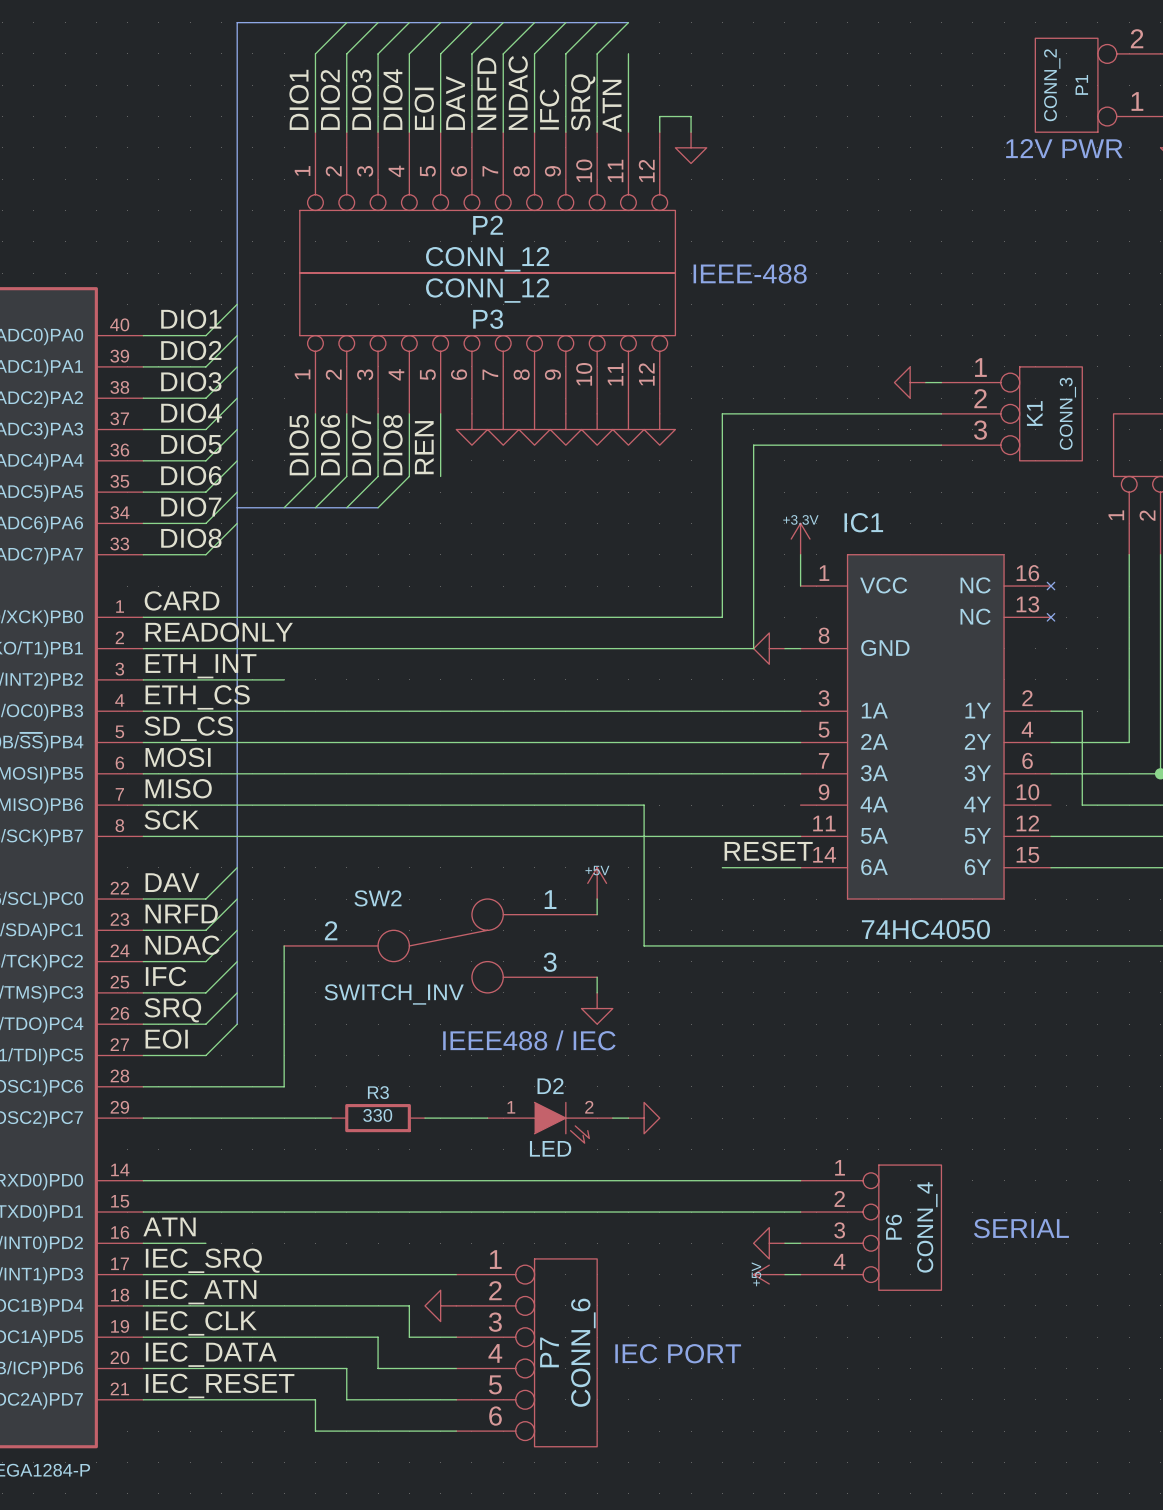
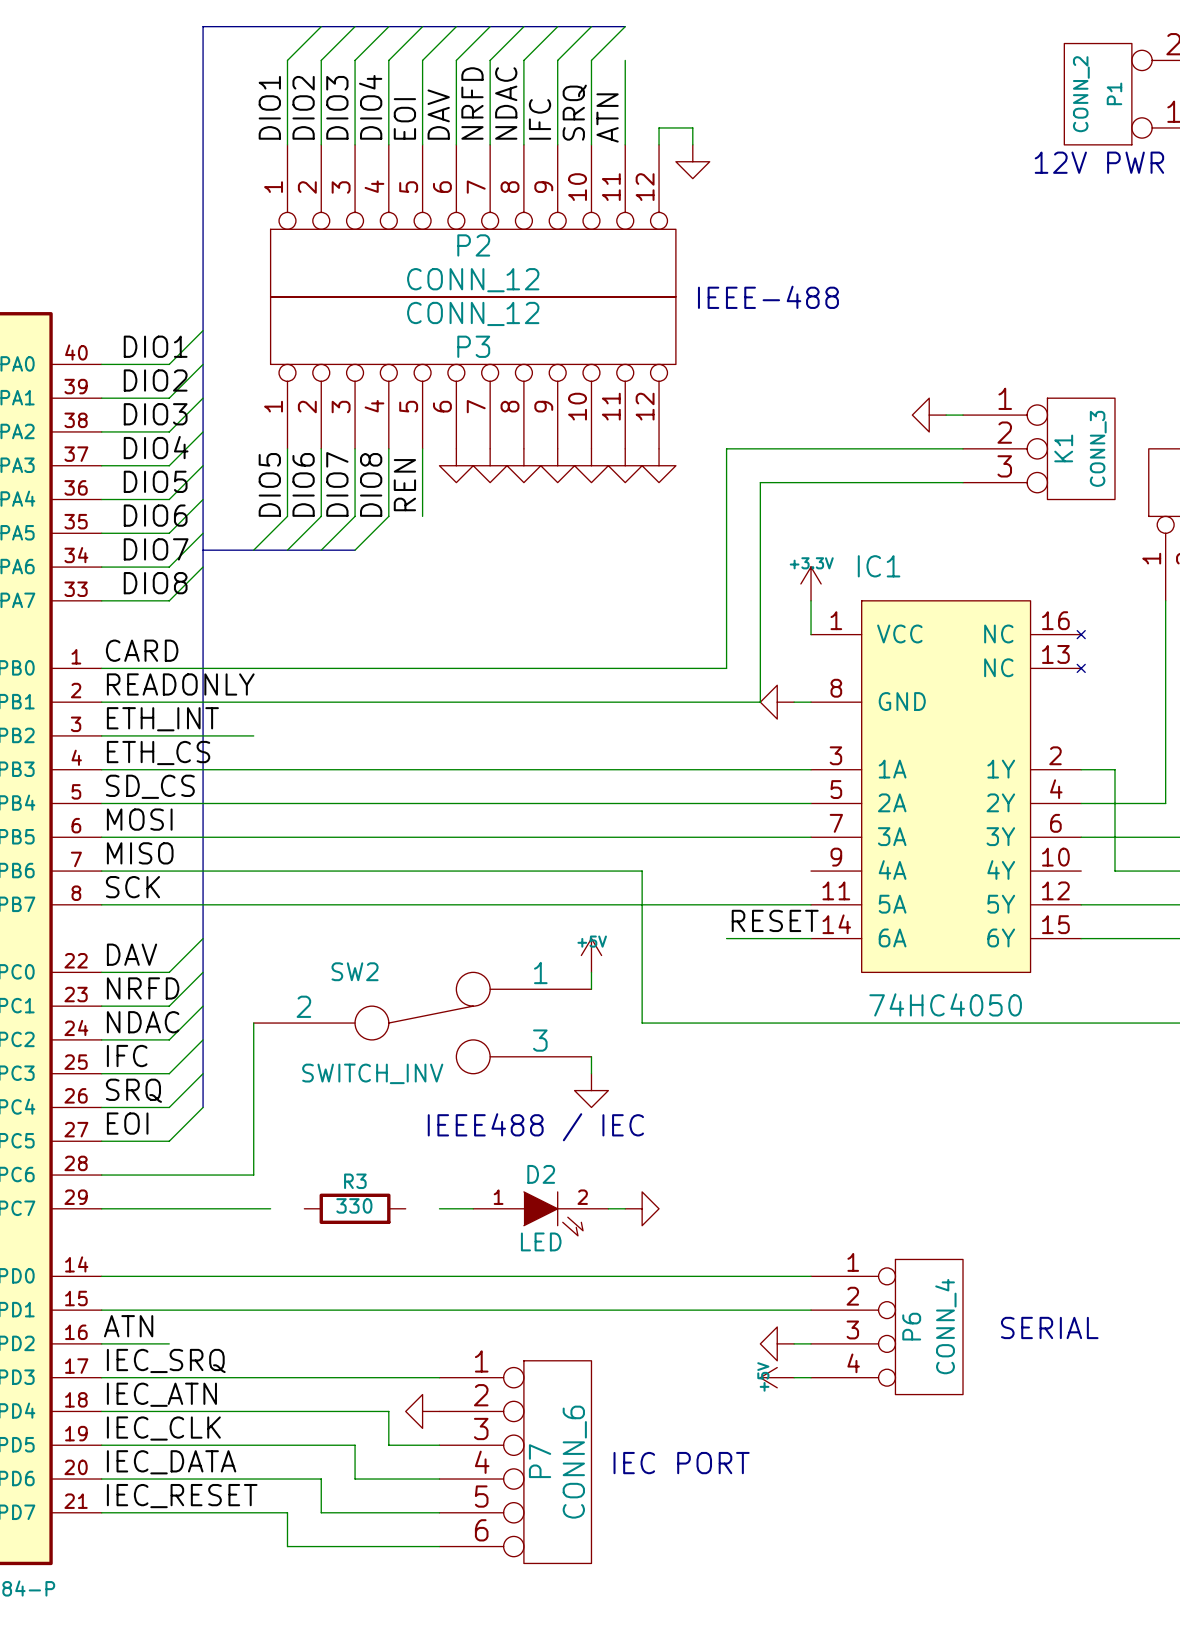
wire: (299, 1118) (331, 1118) -> none
wire: (425, 1118) (456, 1118) -> none

